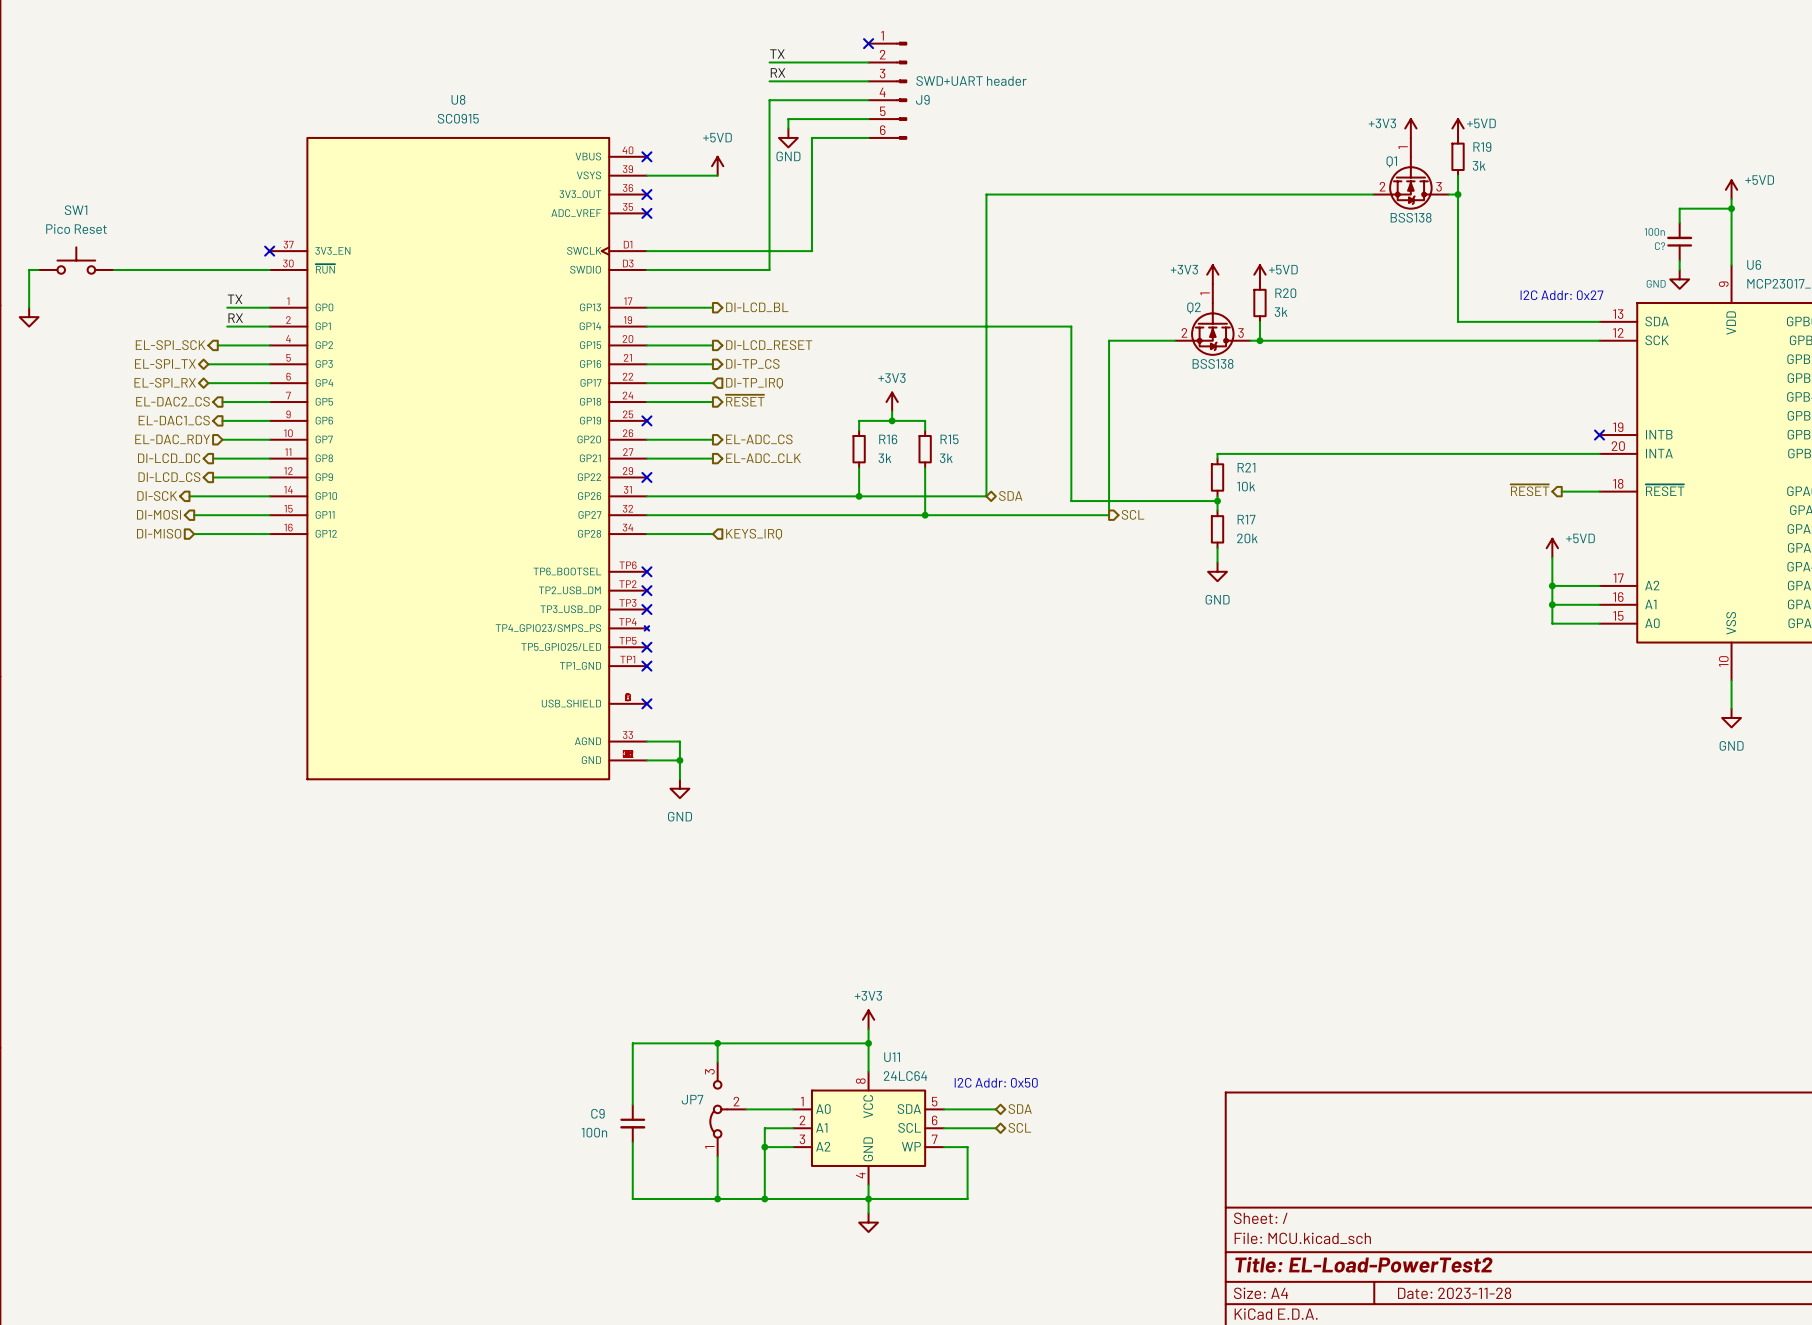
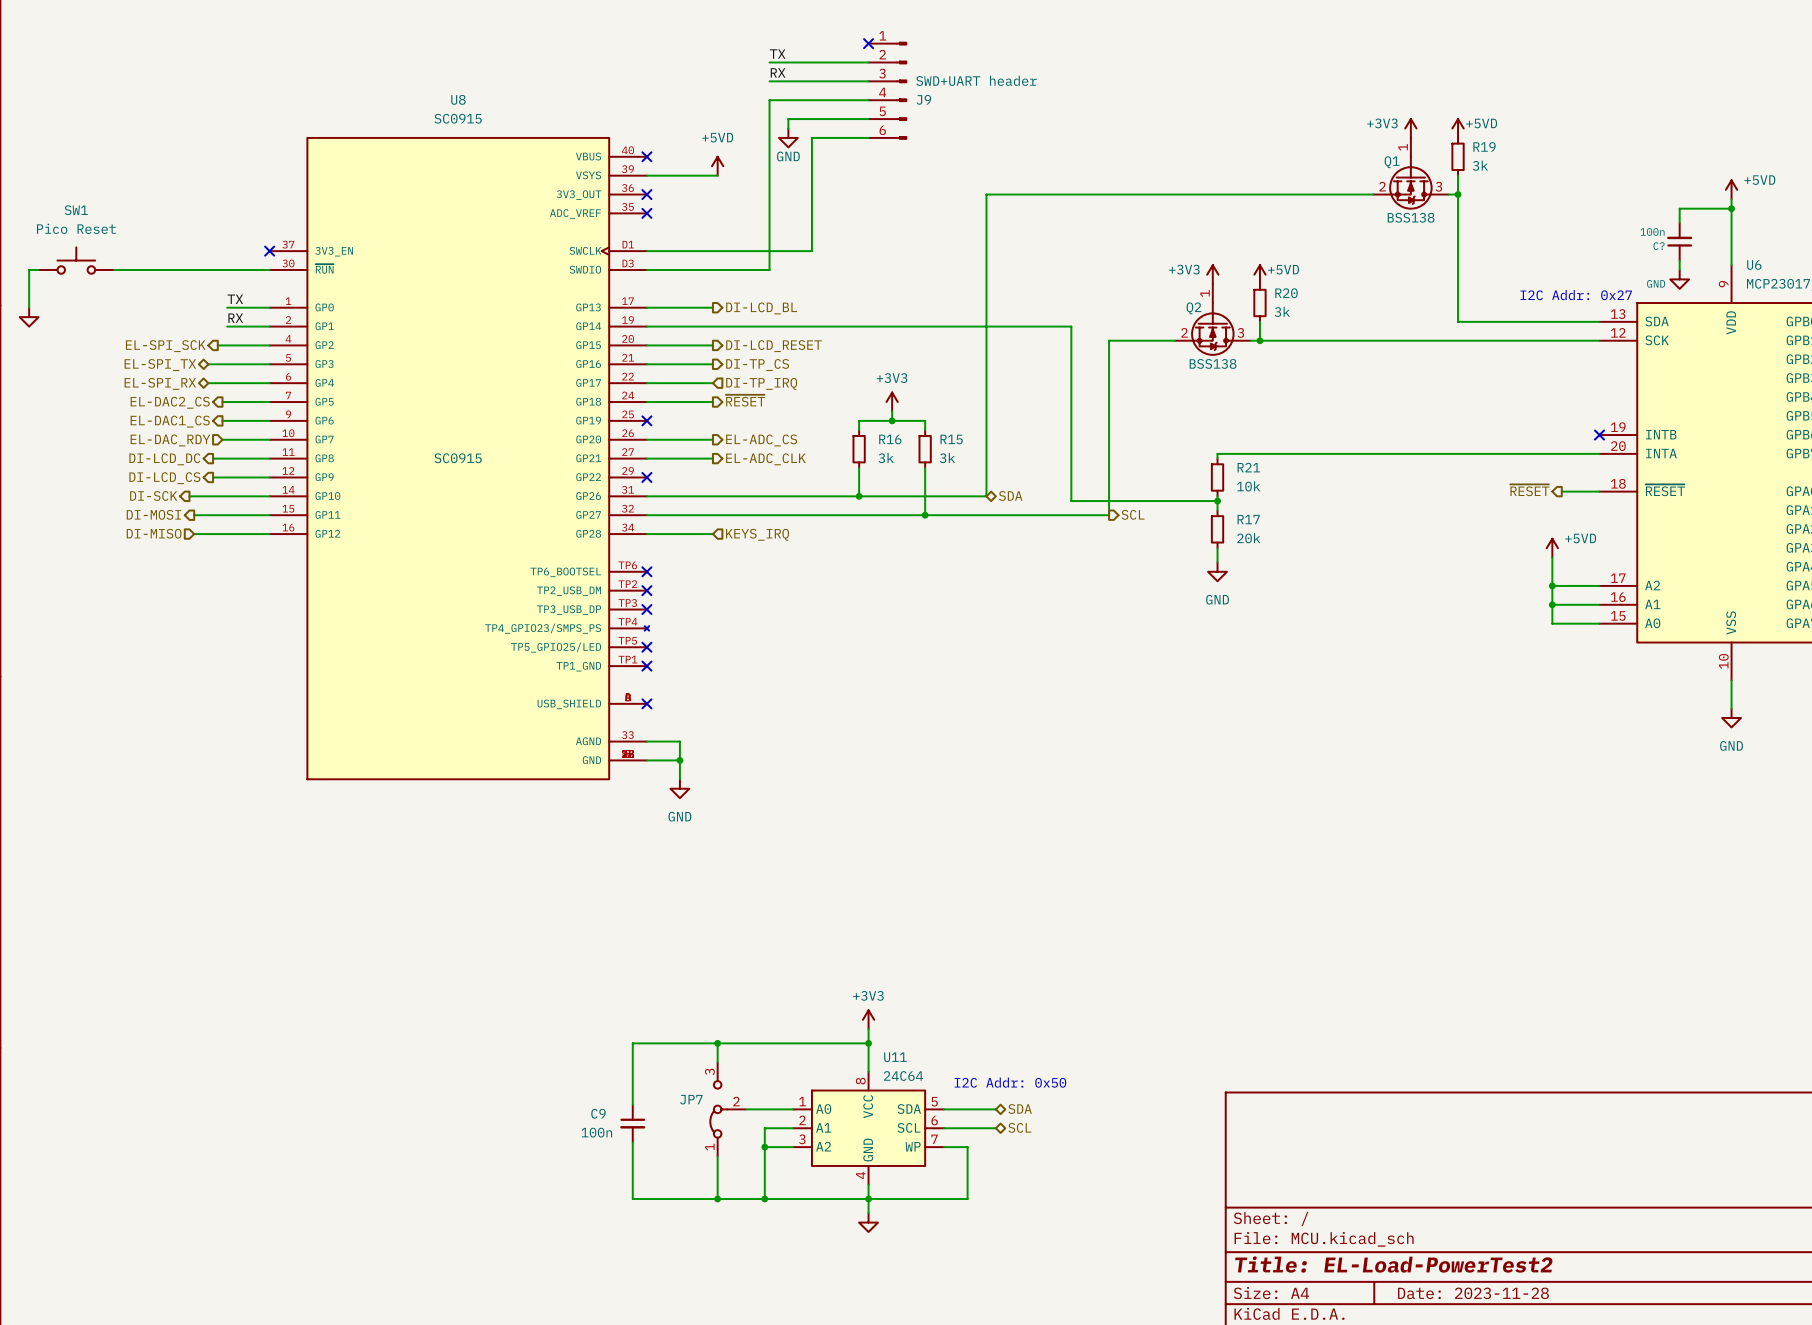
U8 text: none -> SC0915 (458, 458)
U11 value: 24LC64 (905, 1076) -> 24C64 (903, 1076)

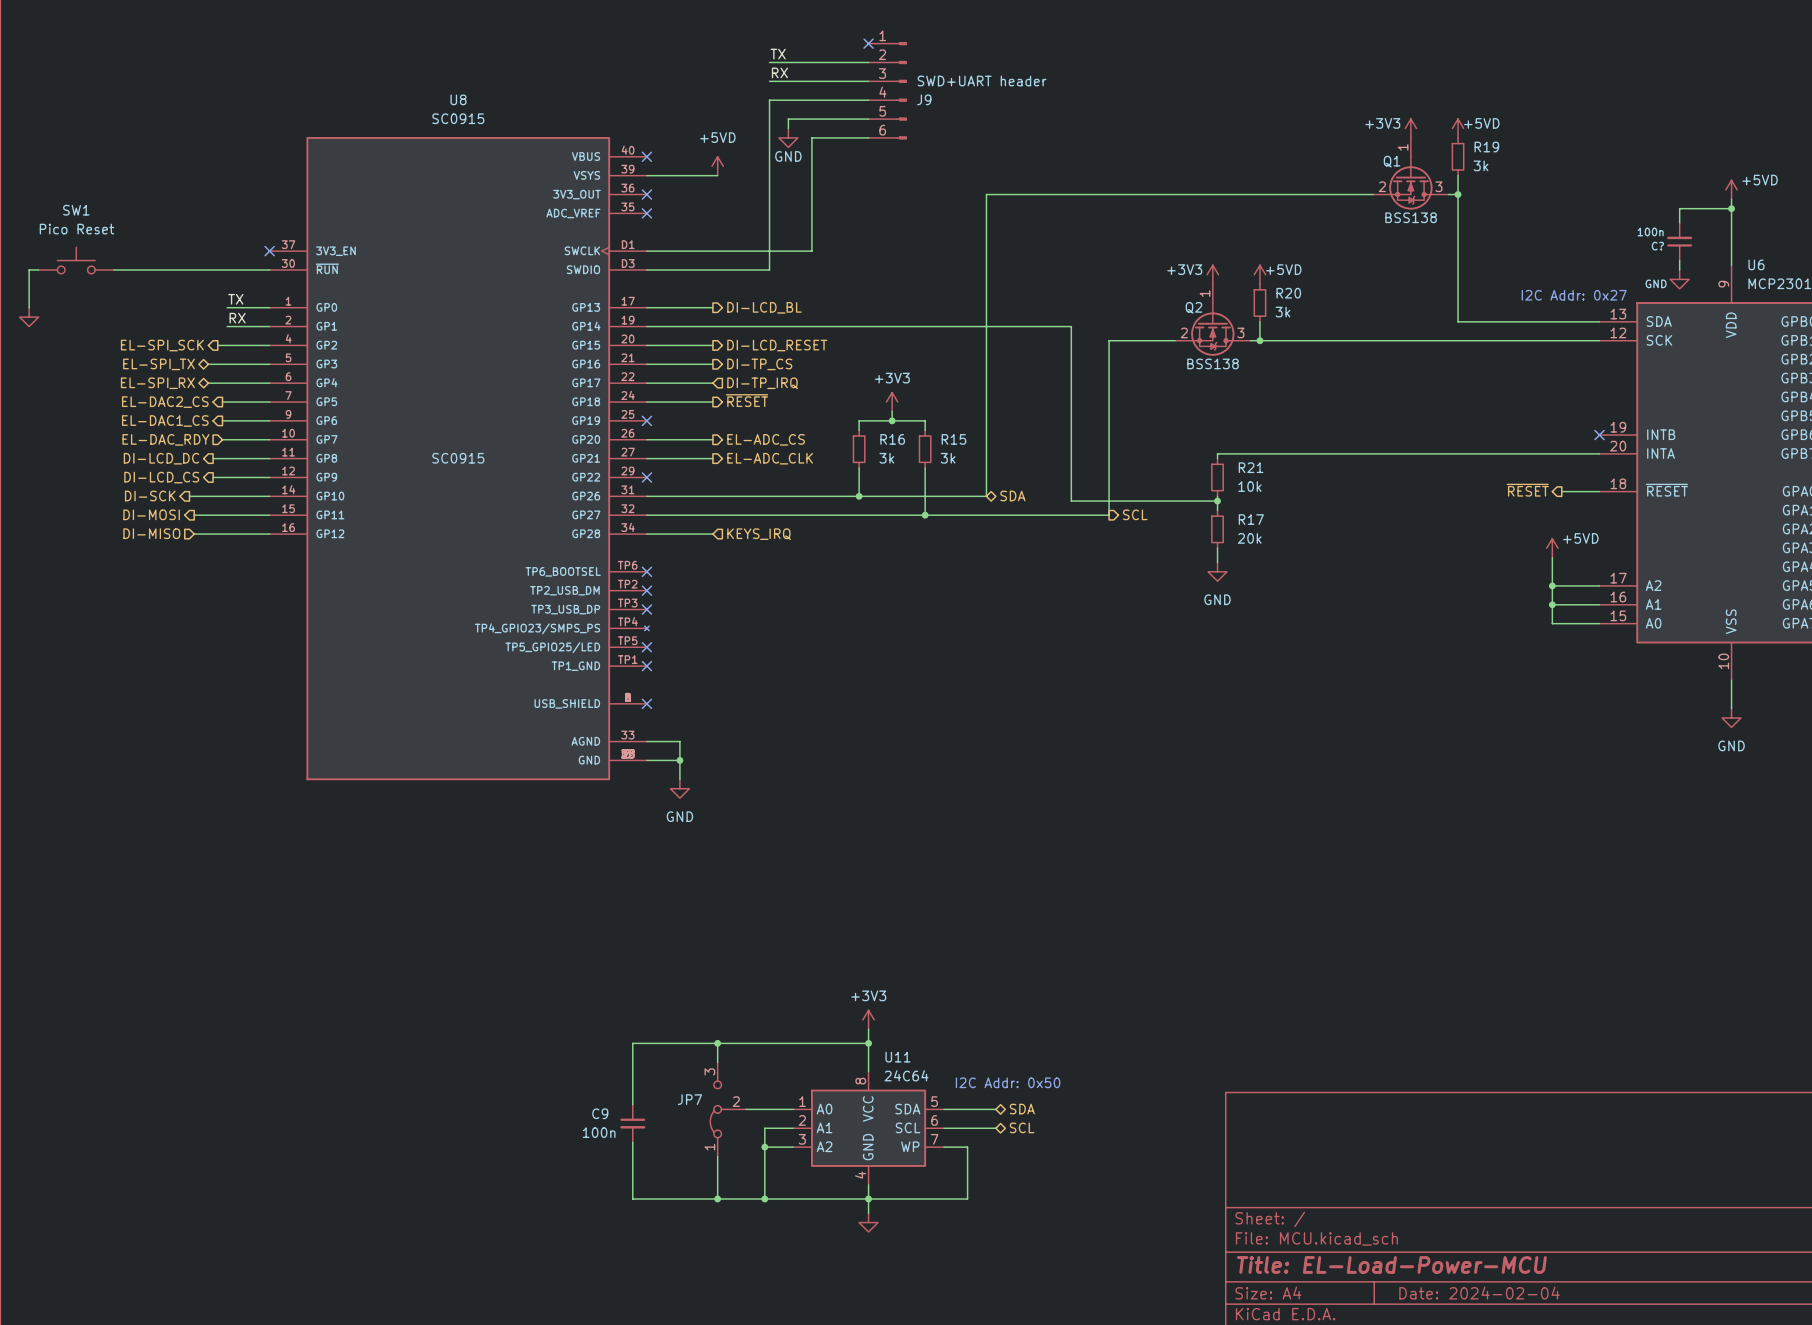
title block: Title: EL-Load-PowerTest2 (1393, 1264) -> Title: EL-Load-Power-MCU (1391, 1264)
title block: Date: 2023-11-28 (1473, 1293) -> Date: 2024-02-04 (1479, 1293)

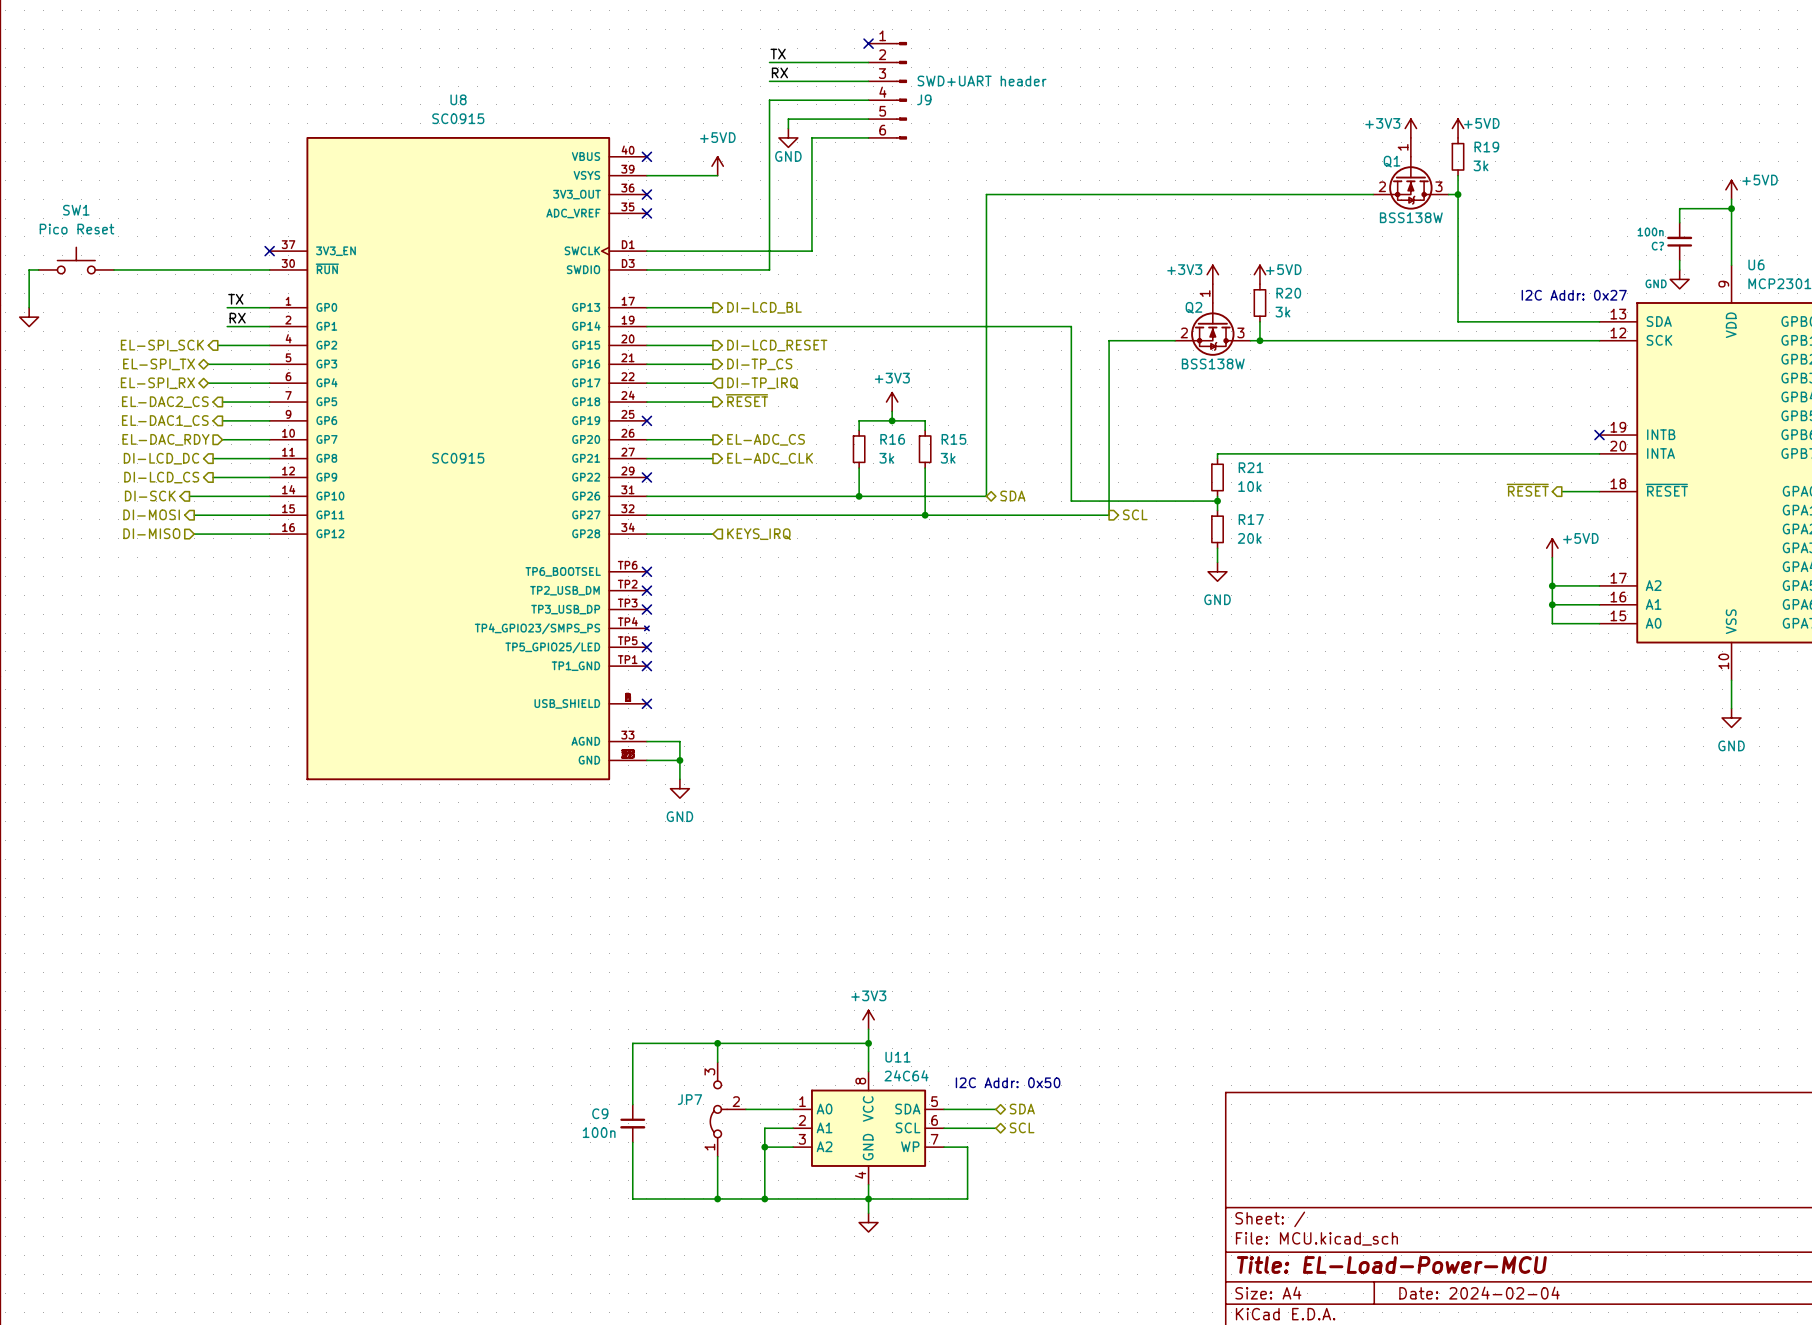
Q1 value: BSS138 (1411, 217) -> BSS138W (1411, 217)
Q2 value: BSS138 (1213, 363) -> BSS138W (1213, 363)

